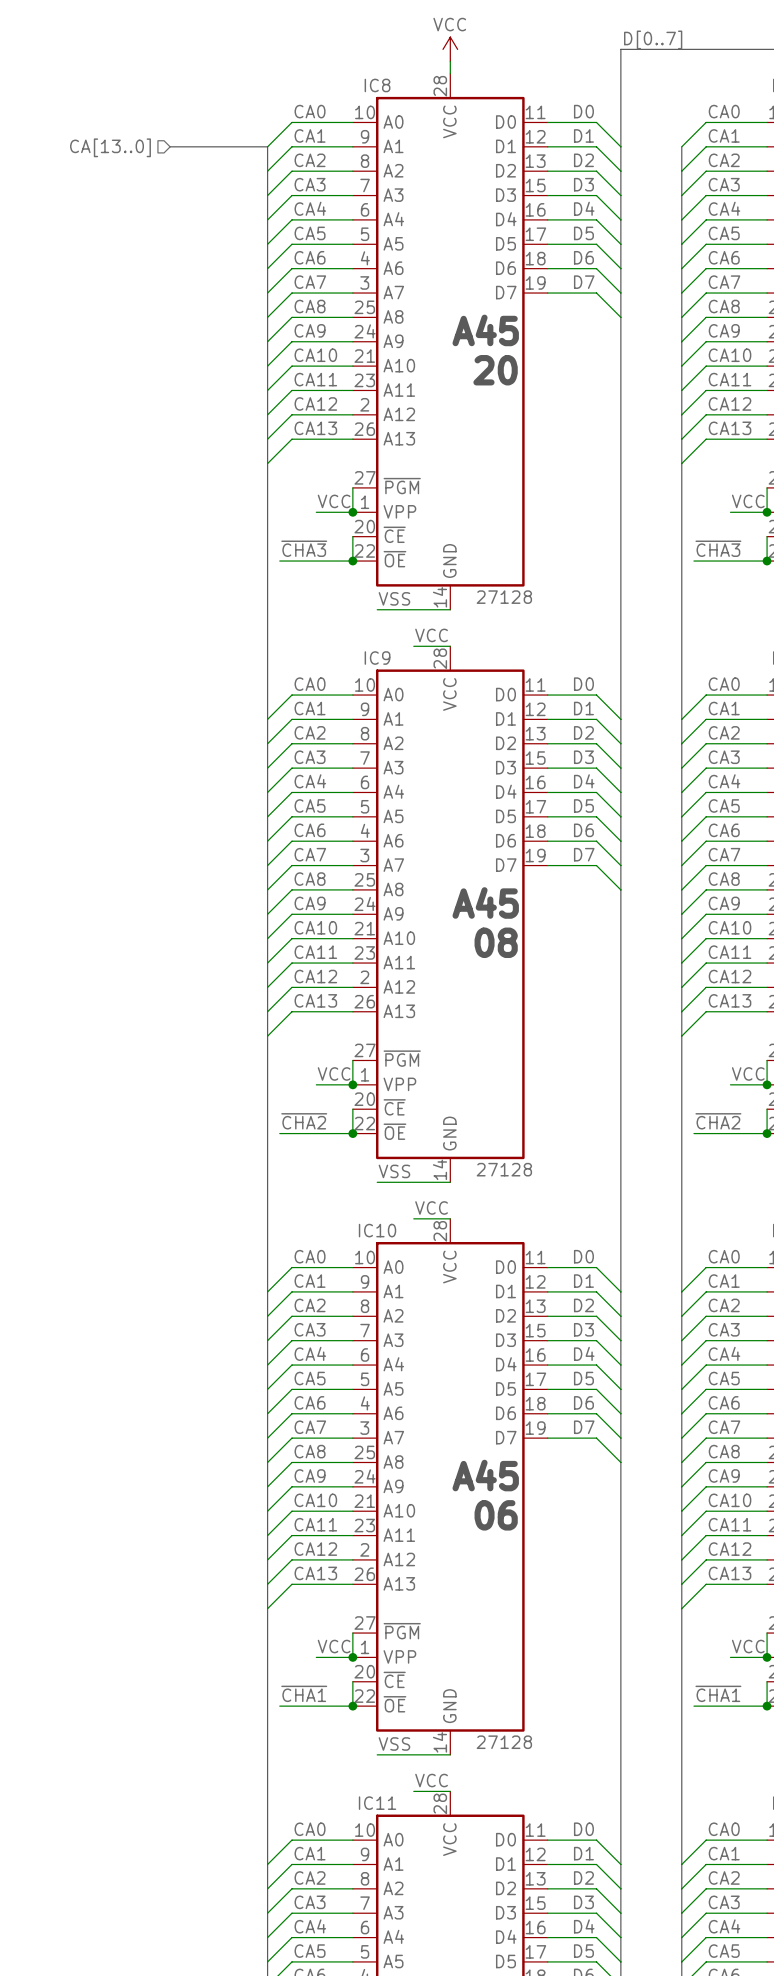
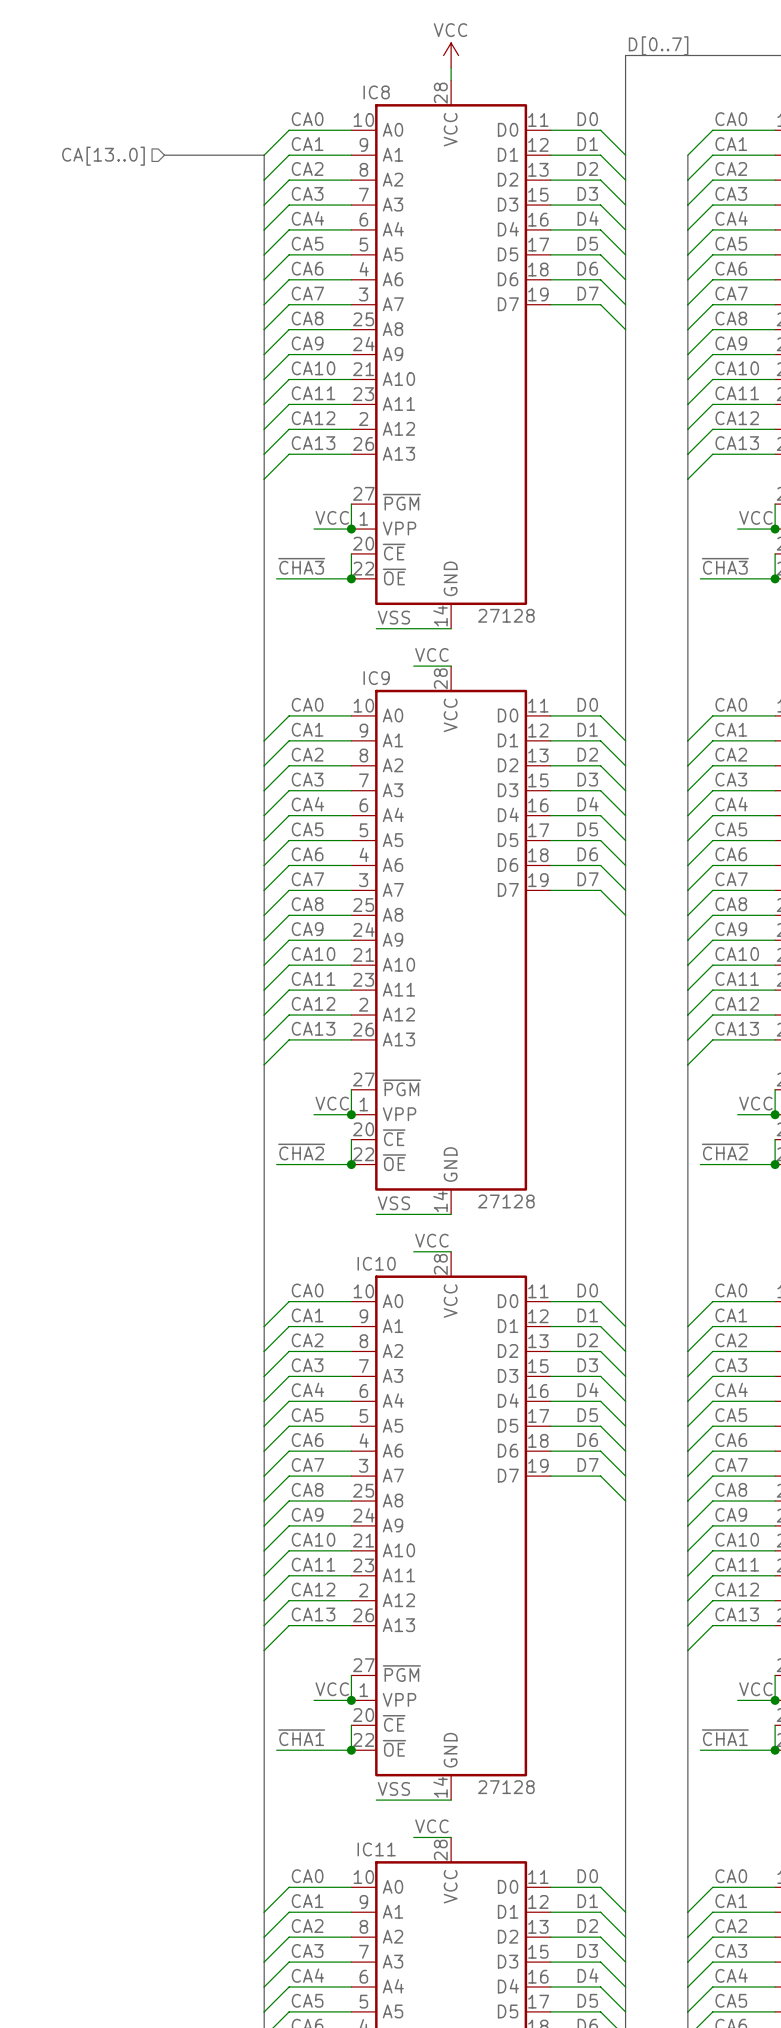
text: A45 (485, 330) -> none
text: 20 (495, 370) -> none
text: A45 (485, 902) -> none
text: 08 (496, 942) -> none
text: A45 (485, 1475) -> none
text: 06 (496, 1515) -> none

